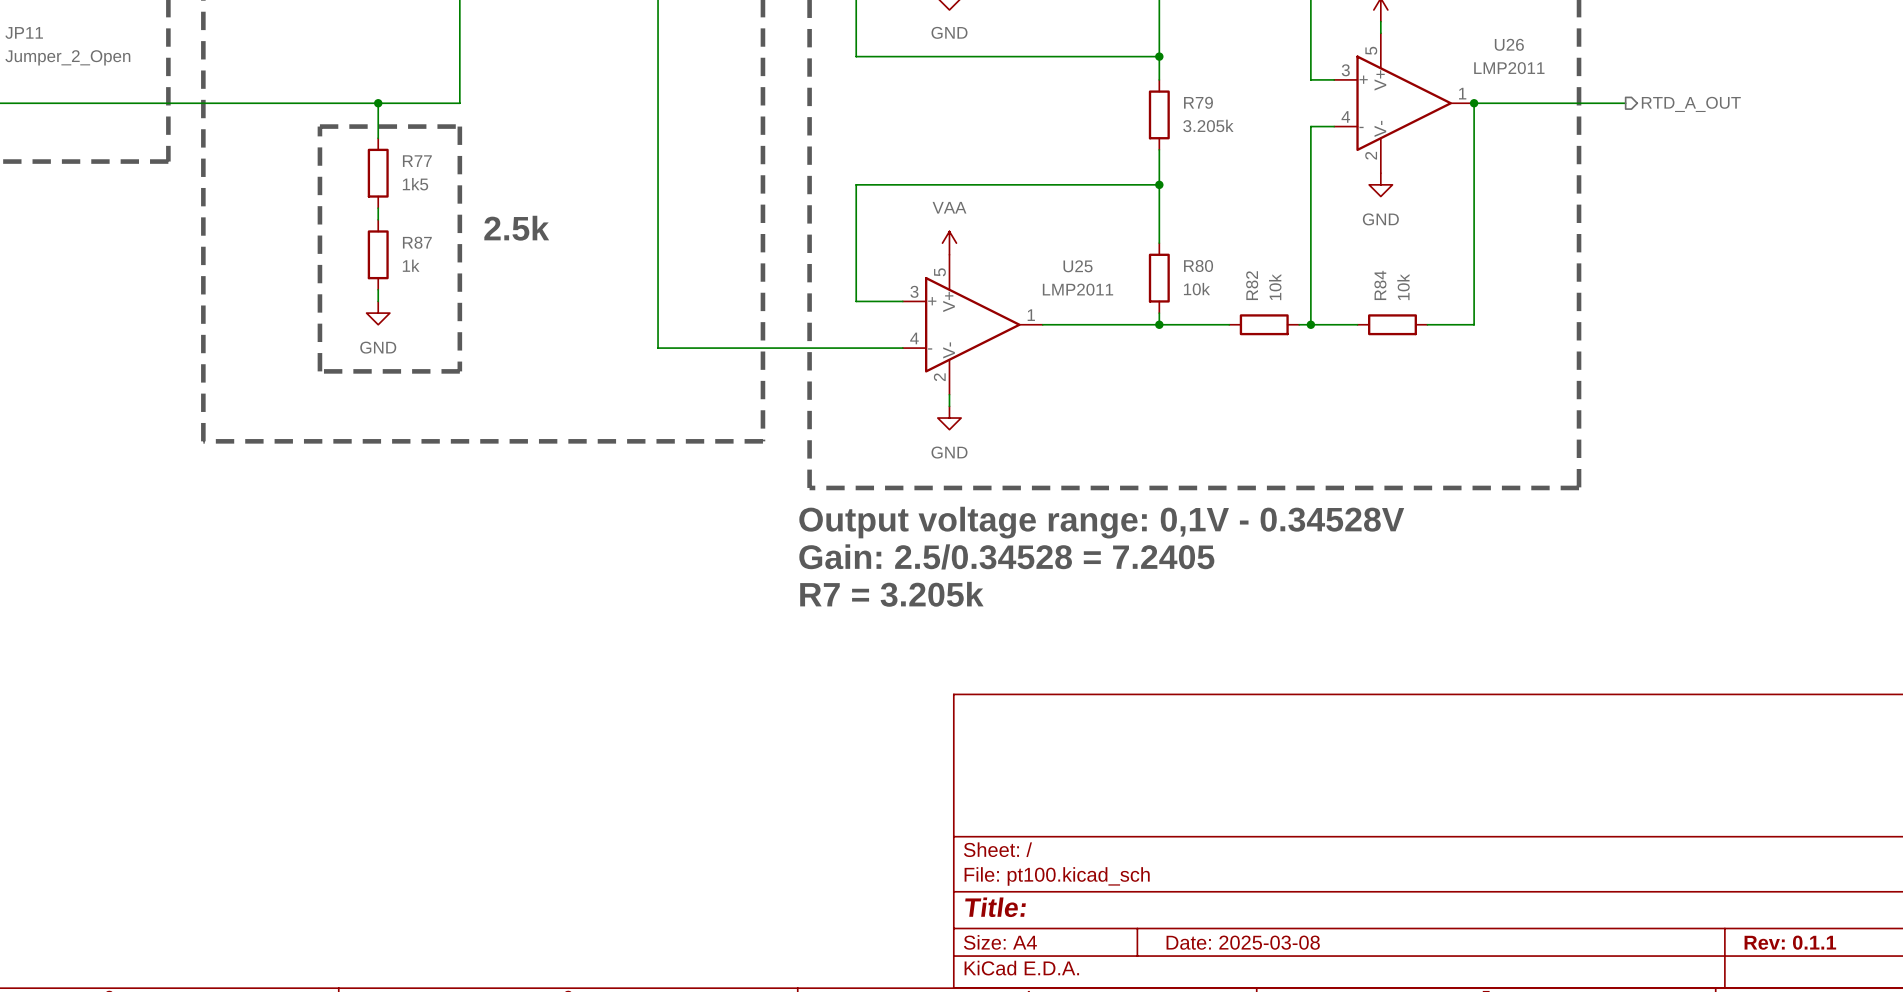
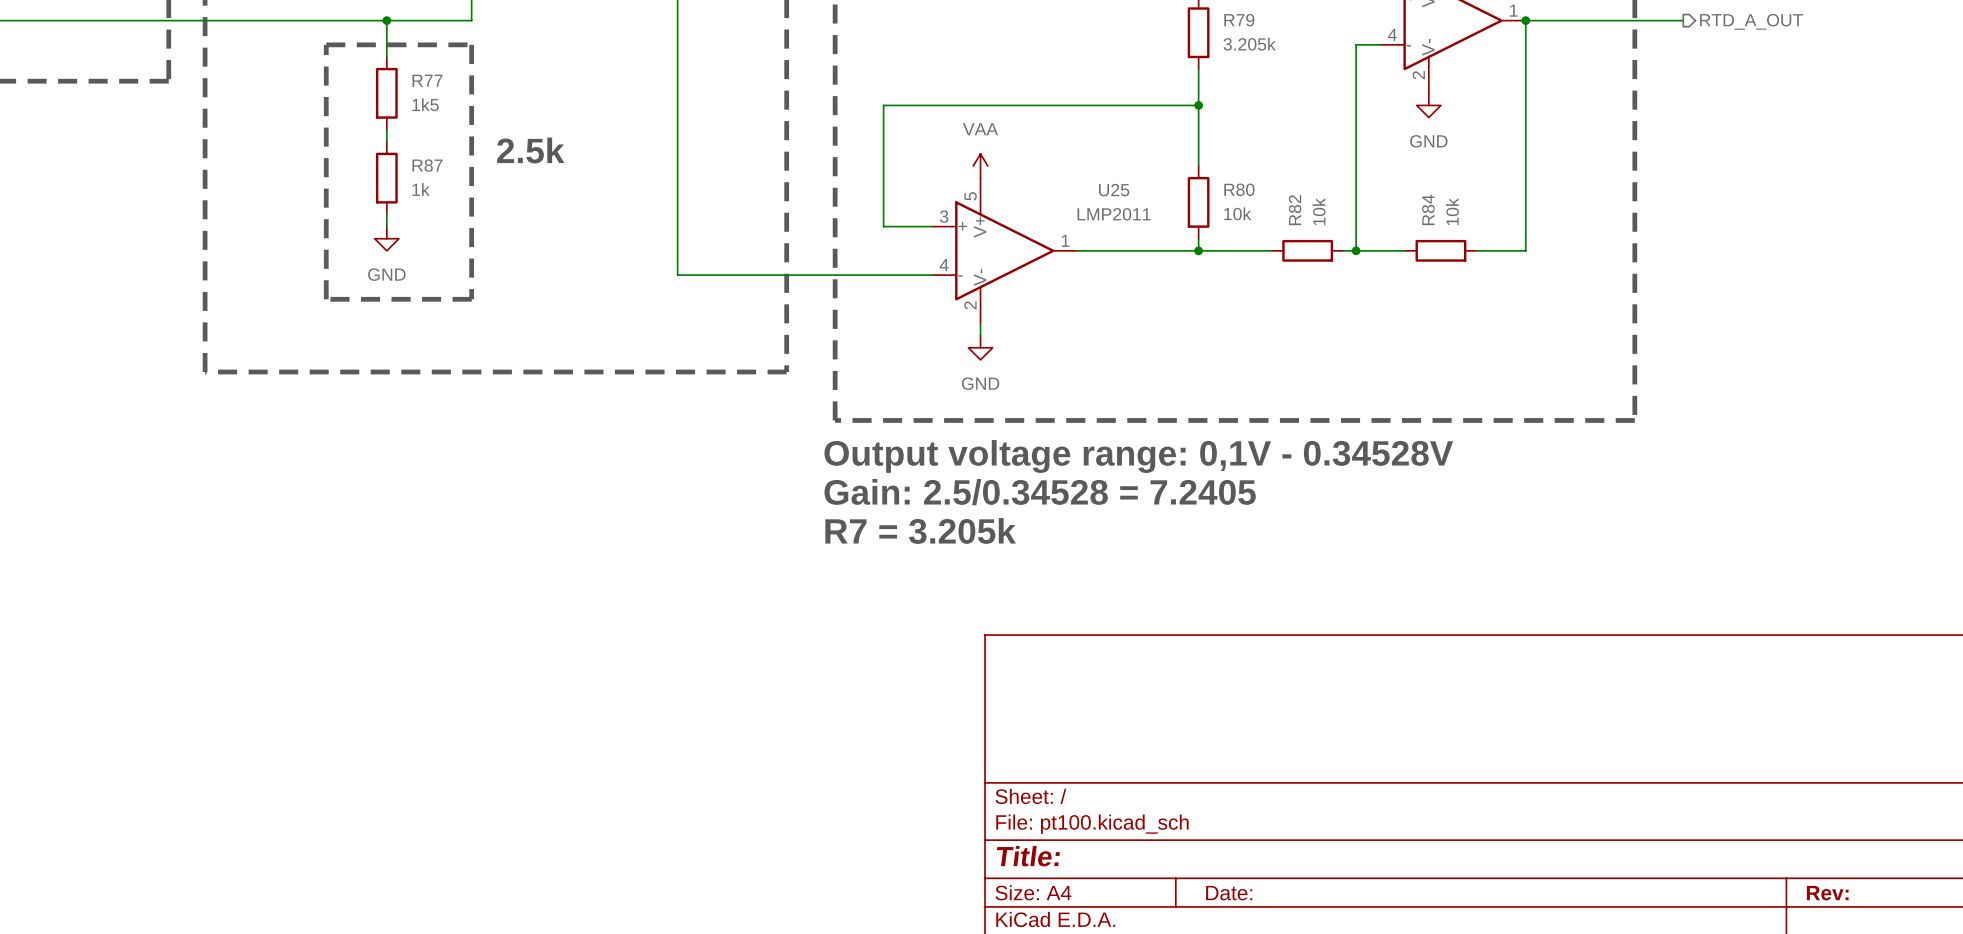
title block: Date: 2025-03-08 (1243, 942) -> Date: (1229, 893)
title block: Rev: 0.1.1 (1790, 942) -> Rev: (1827, 893)

